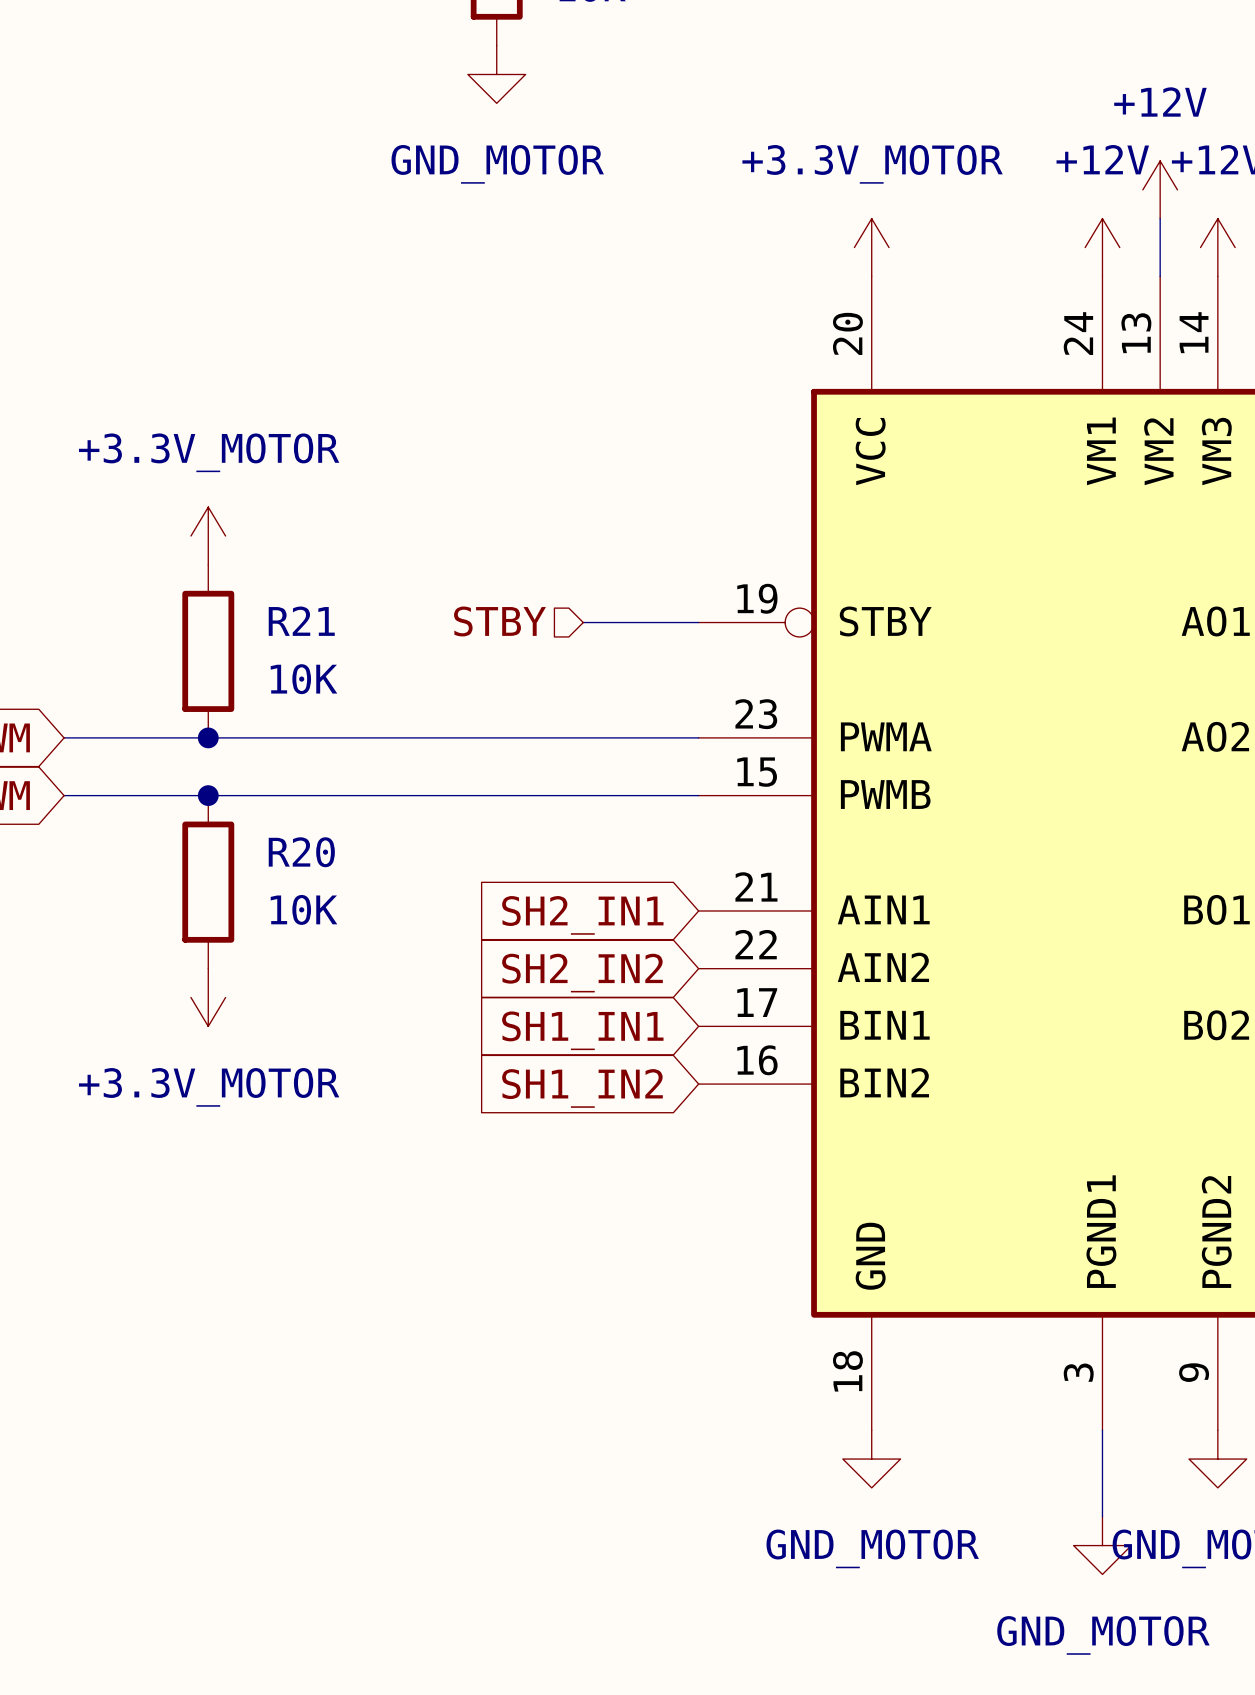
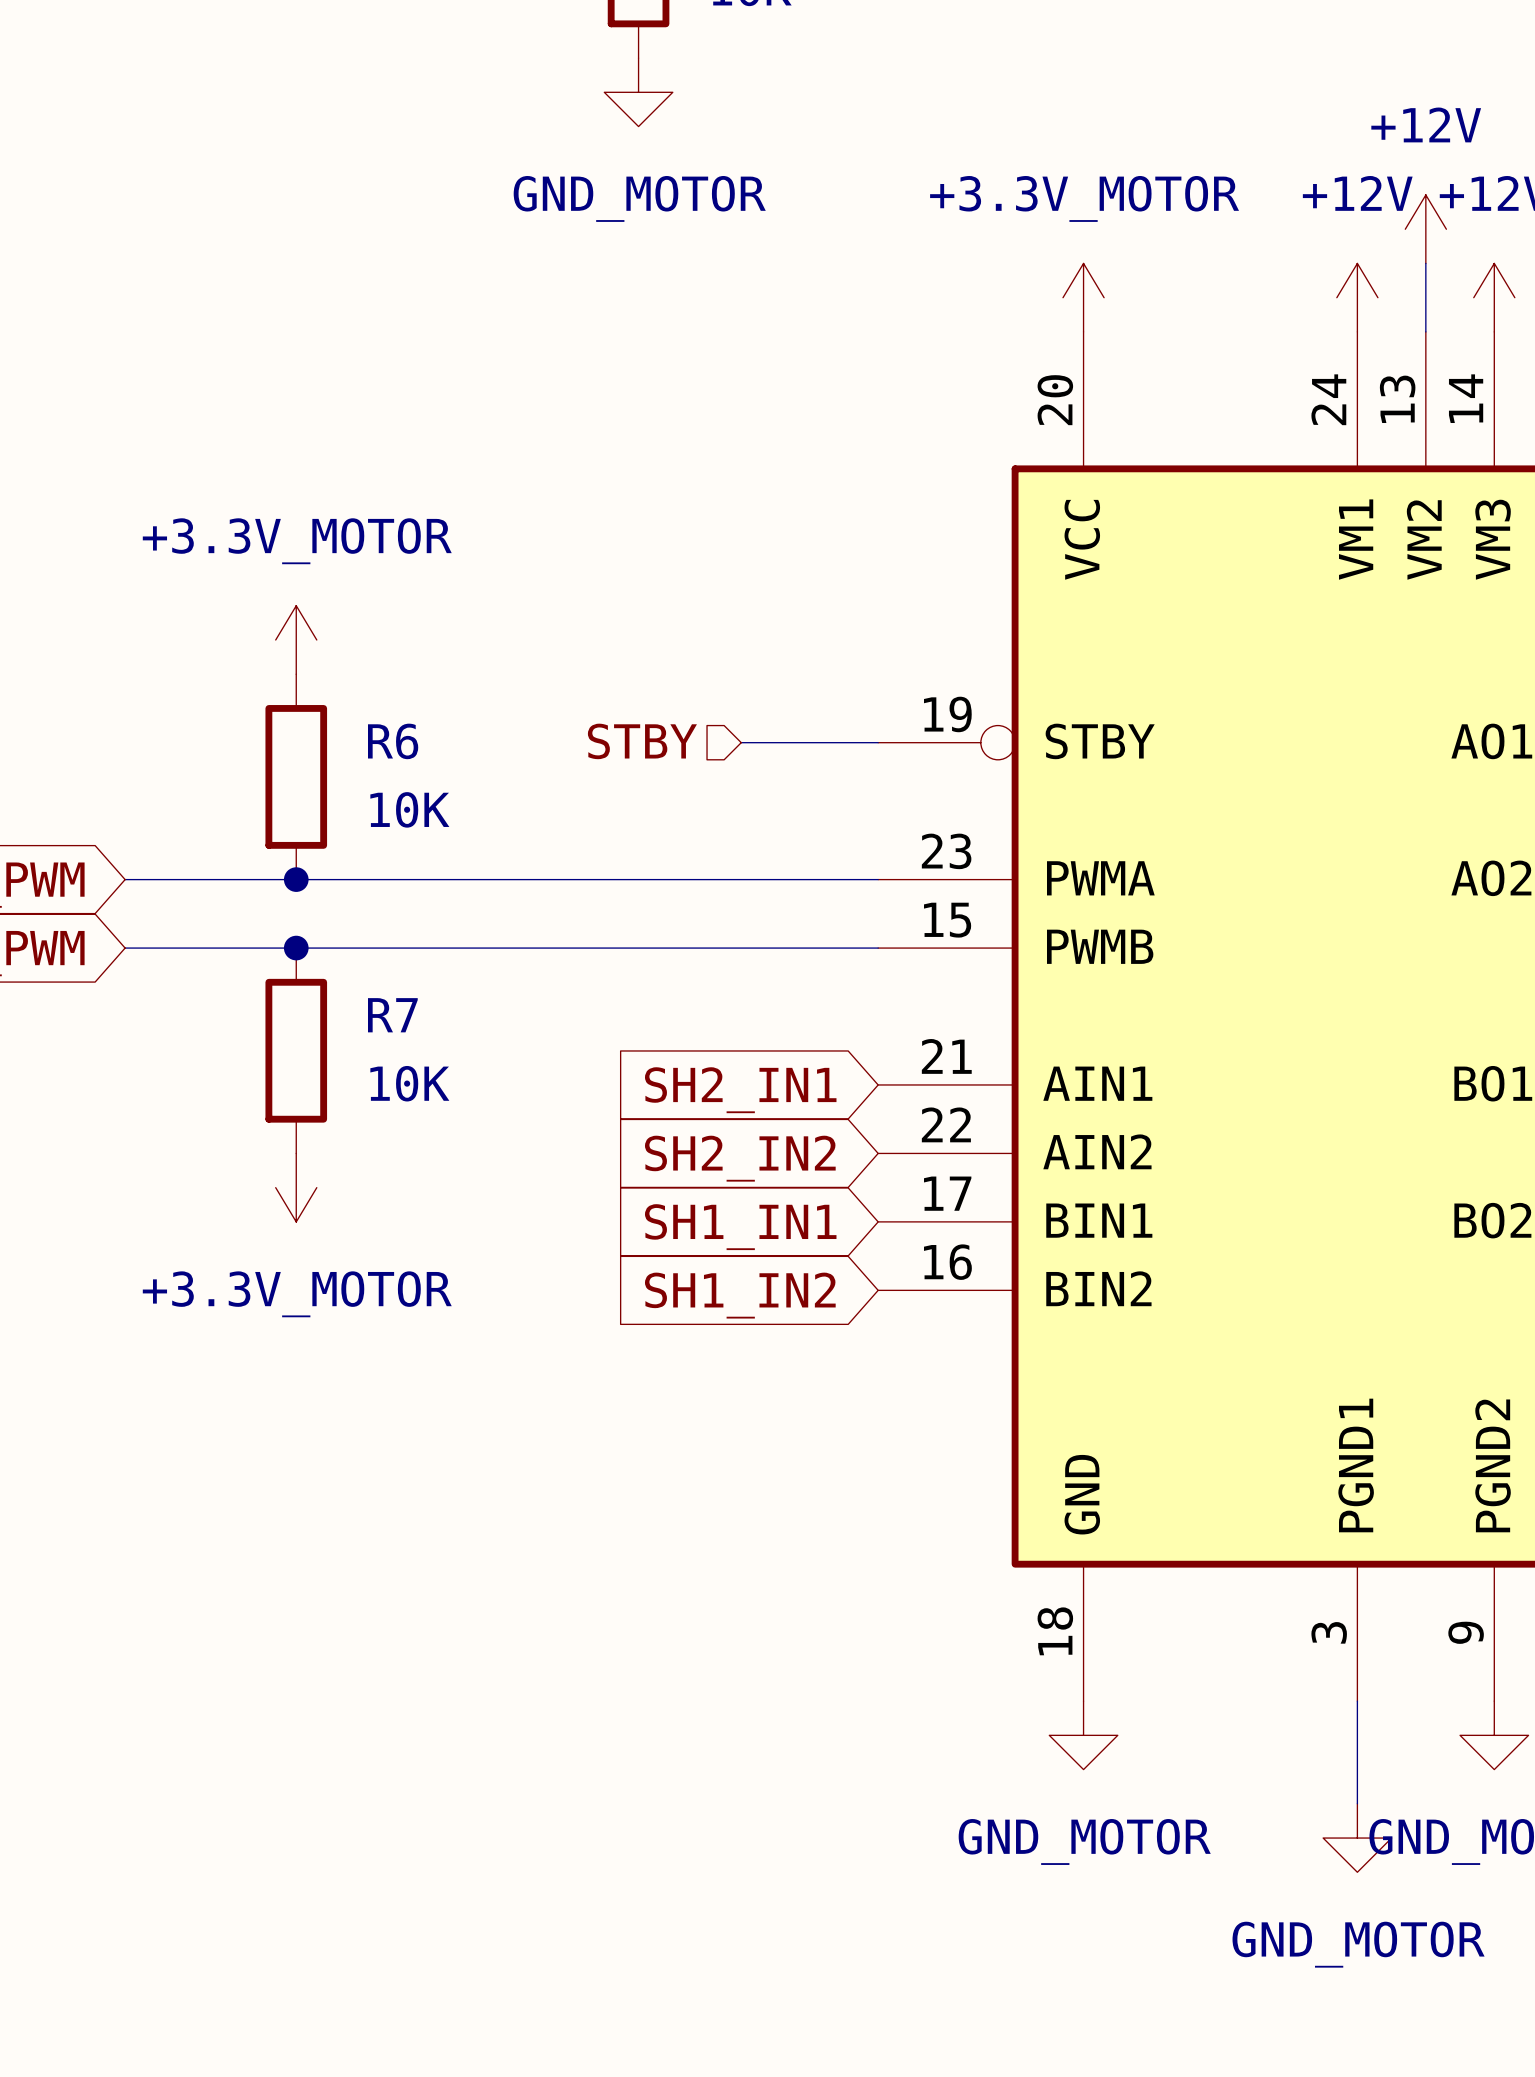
R21 name: R21 (301, 621) -> R6 (393, 741)
R20 name: R20 (301, 852) -> R7 (392, 1015)

